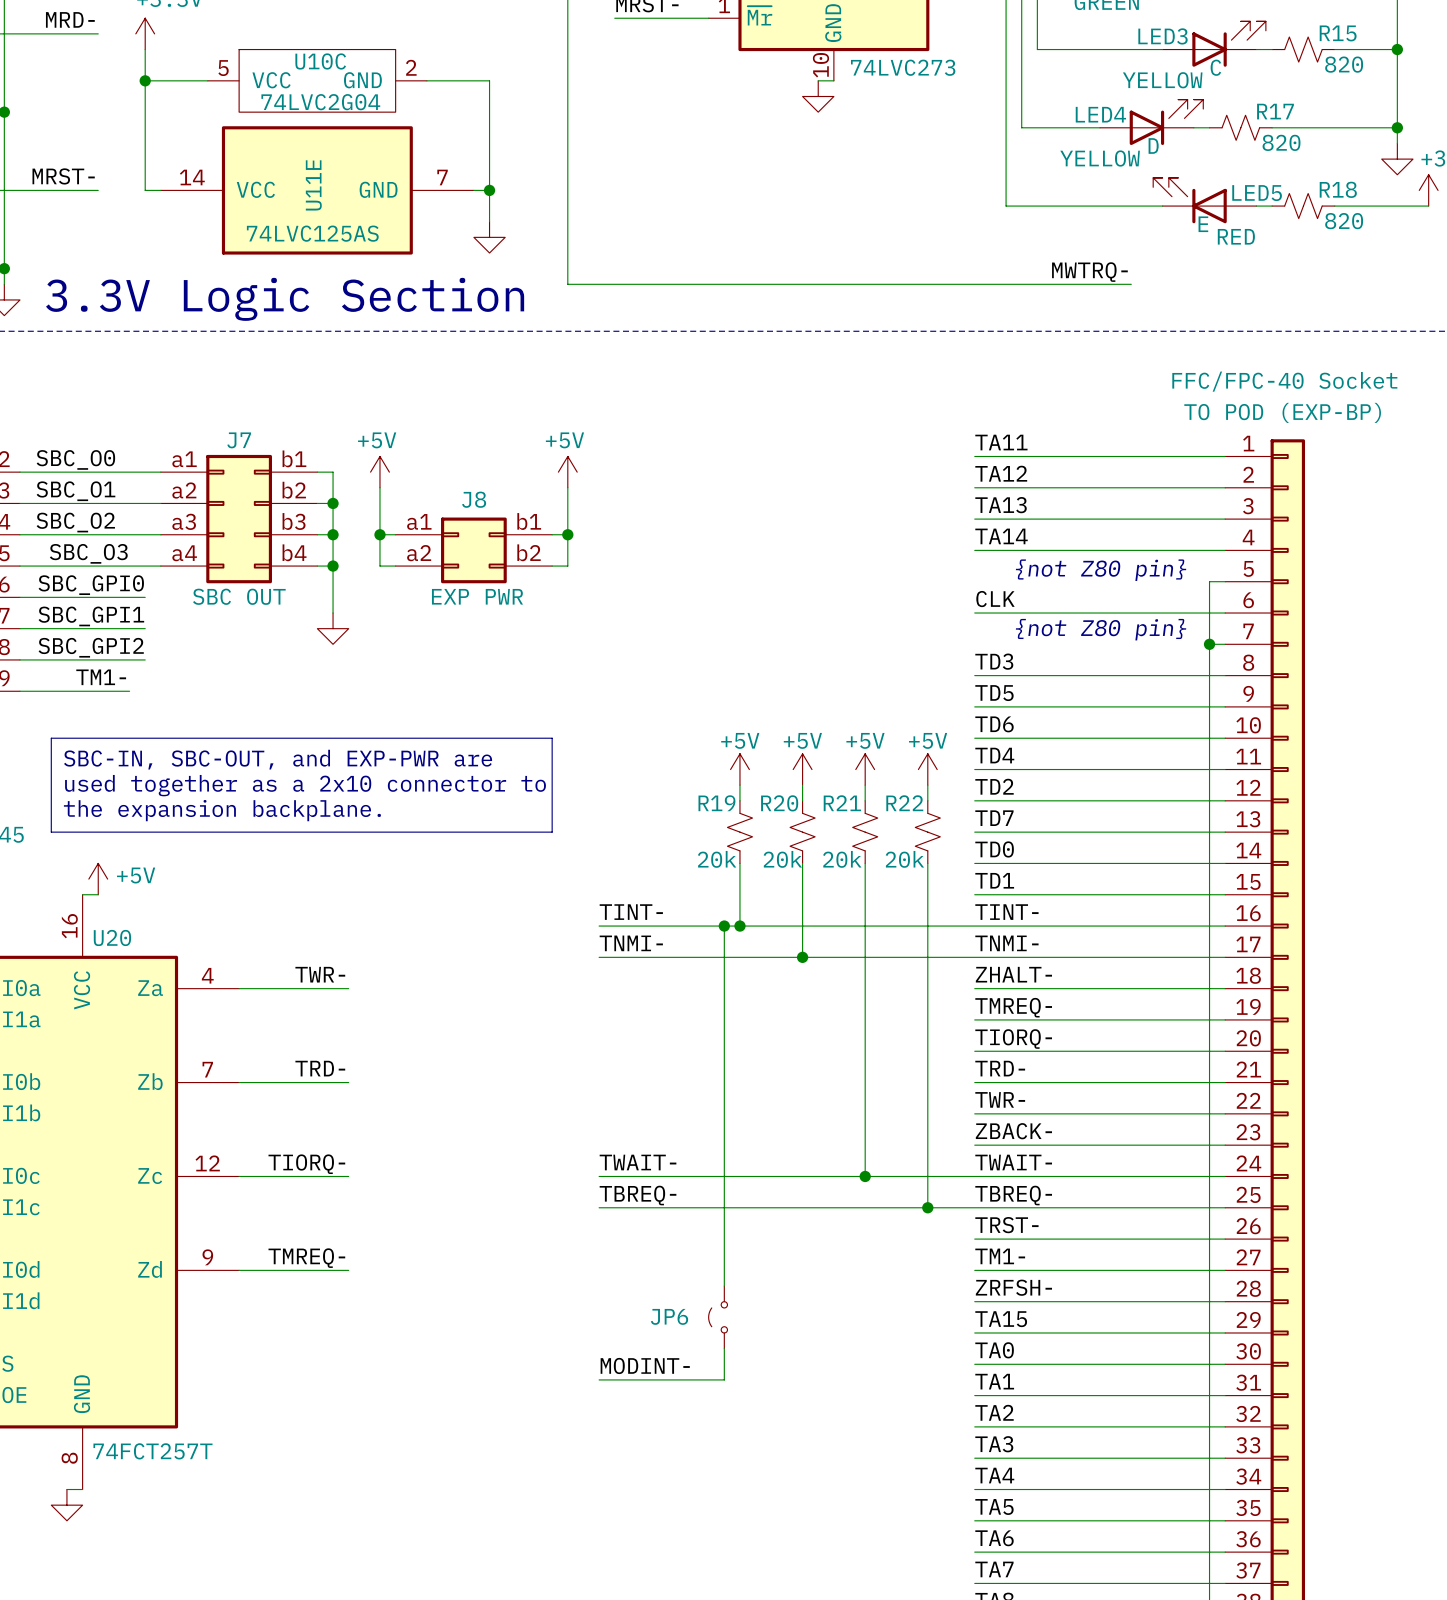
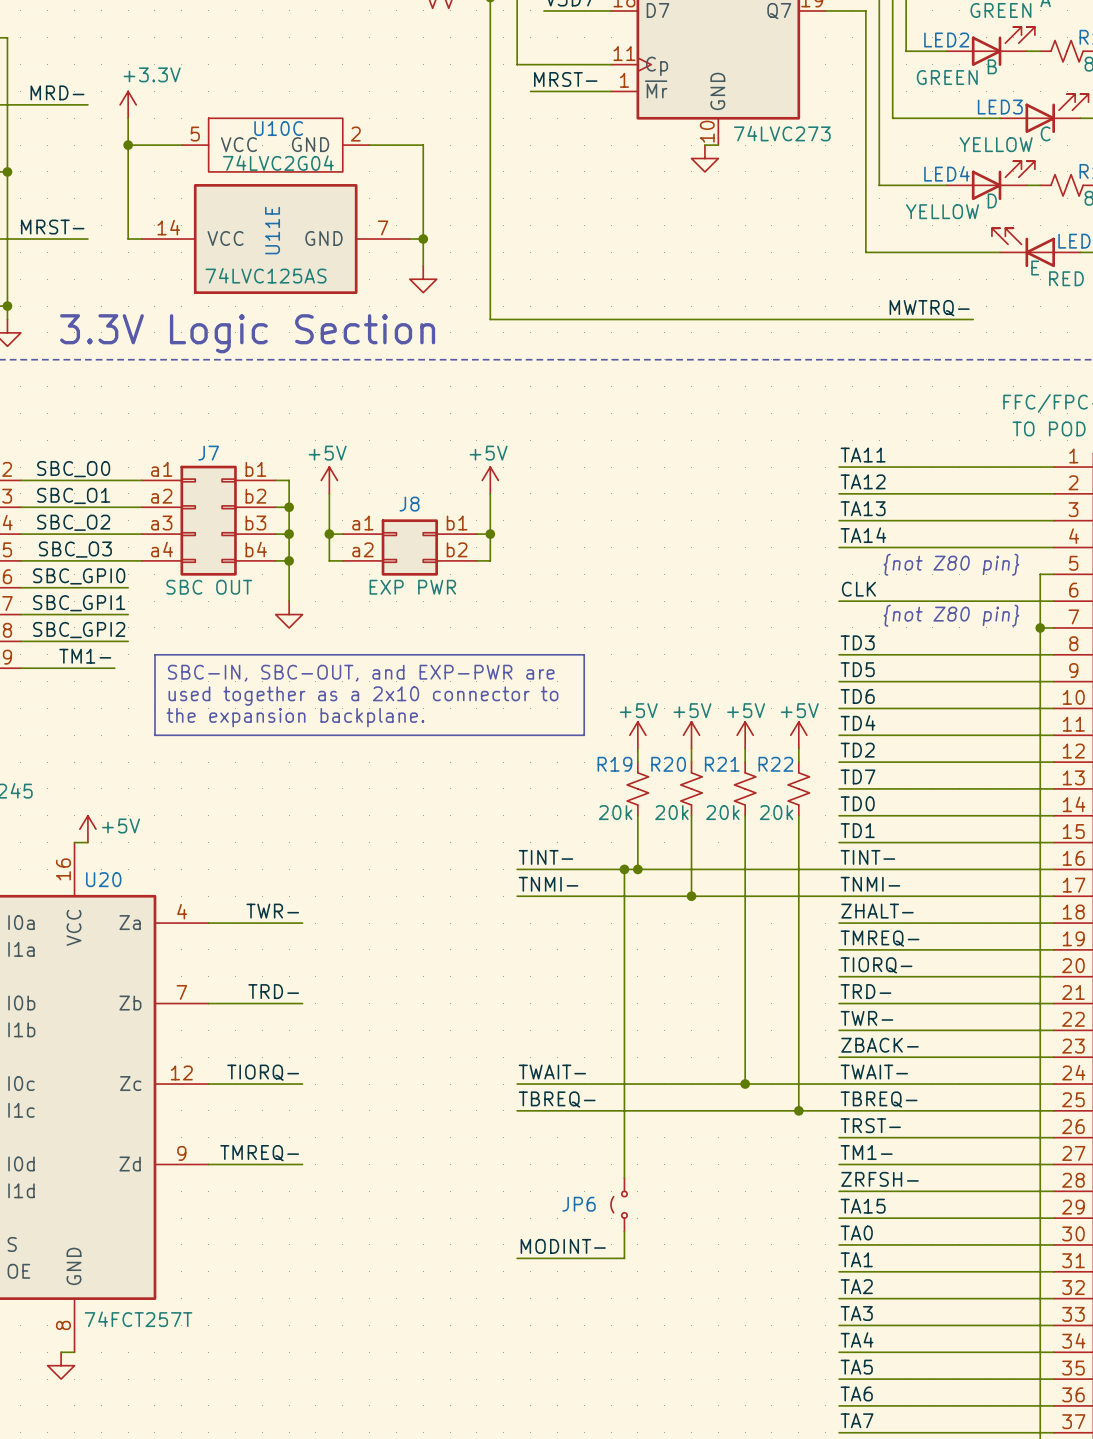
line: (51, 738) (552, 738) (552, 832) (51, 832) (51, 738) -> (154, 654) (584, 654) (584, 735) (154, 735) (154, 654)
text position: SBC-IN, SBC-OUT, and EXP-PWR are (278, 759) -> SBC-IN, SBC-OUT, and EXP-PWR are (361, 673)
text position: used together as a 2x10 connector to (305, 785) -> used together as a 2x10 connector to (363, 696)
text position: the expansion backplane. (222, 810) -> the expansion backplane. (295, 717)

